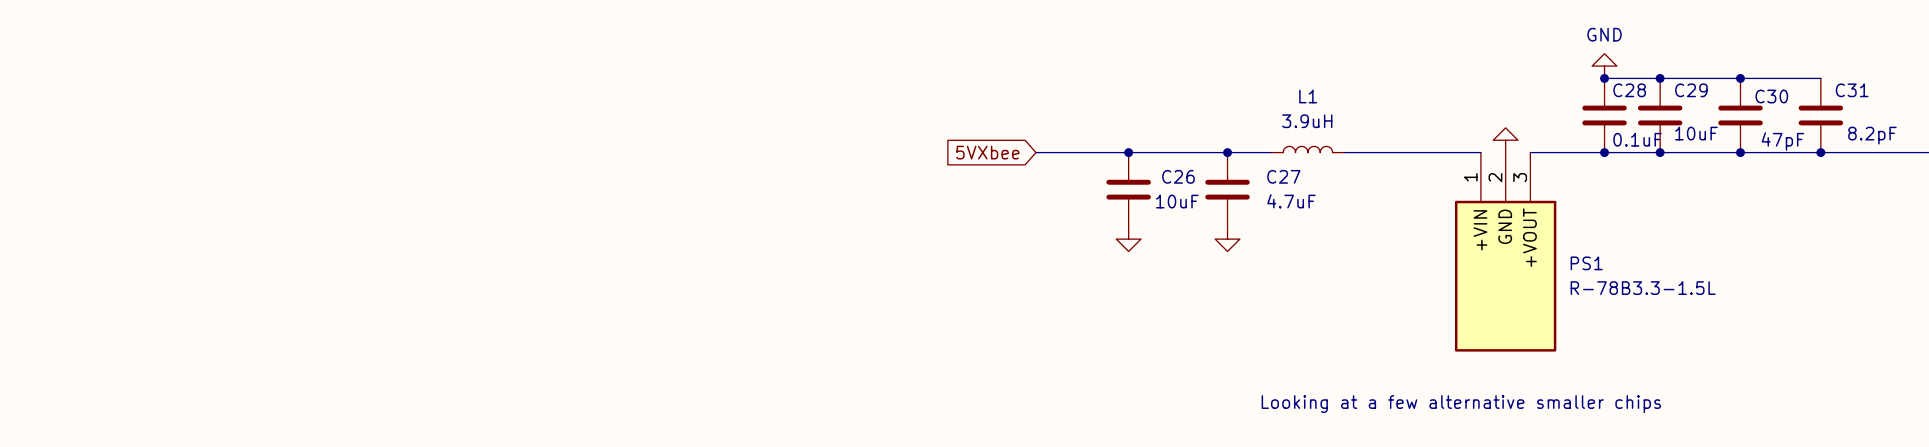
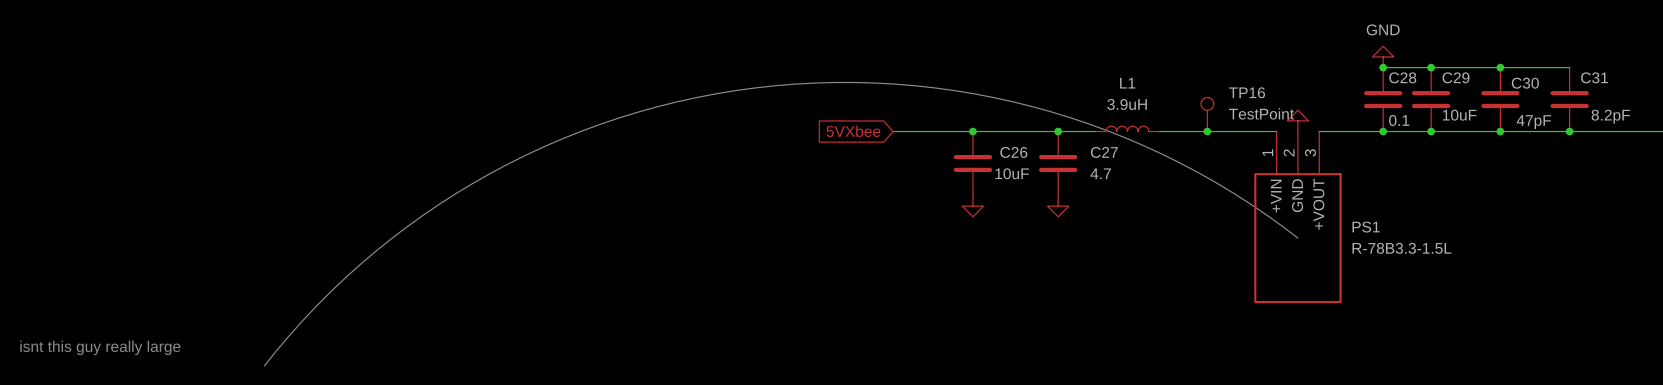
TP16: none -> TestPoint (1207, 114)
C28 value: 0.1uF (1637, 139) -> 0.1 (1399, 120)
junction: none -> (1207, 131)
C27 value: 4.7uF (1291, 201) -> 4.7 (1100, 173)
line: none -> (1297, 238) (1249, 203) (1180, 163) (1107, 130) (1031, 106) (973, 93) (894, 84) (814, 83) (754, 87) (695, 97) (618, 118) (544, 146) (490, 173) (439, 204) (375, 251) (316, 305) (264, 365)
text: none -> isnt this guy really large (100, 347)
text: Looking at a few alternative smaller chips (1461, 404) -> none

